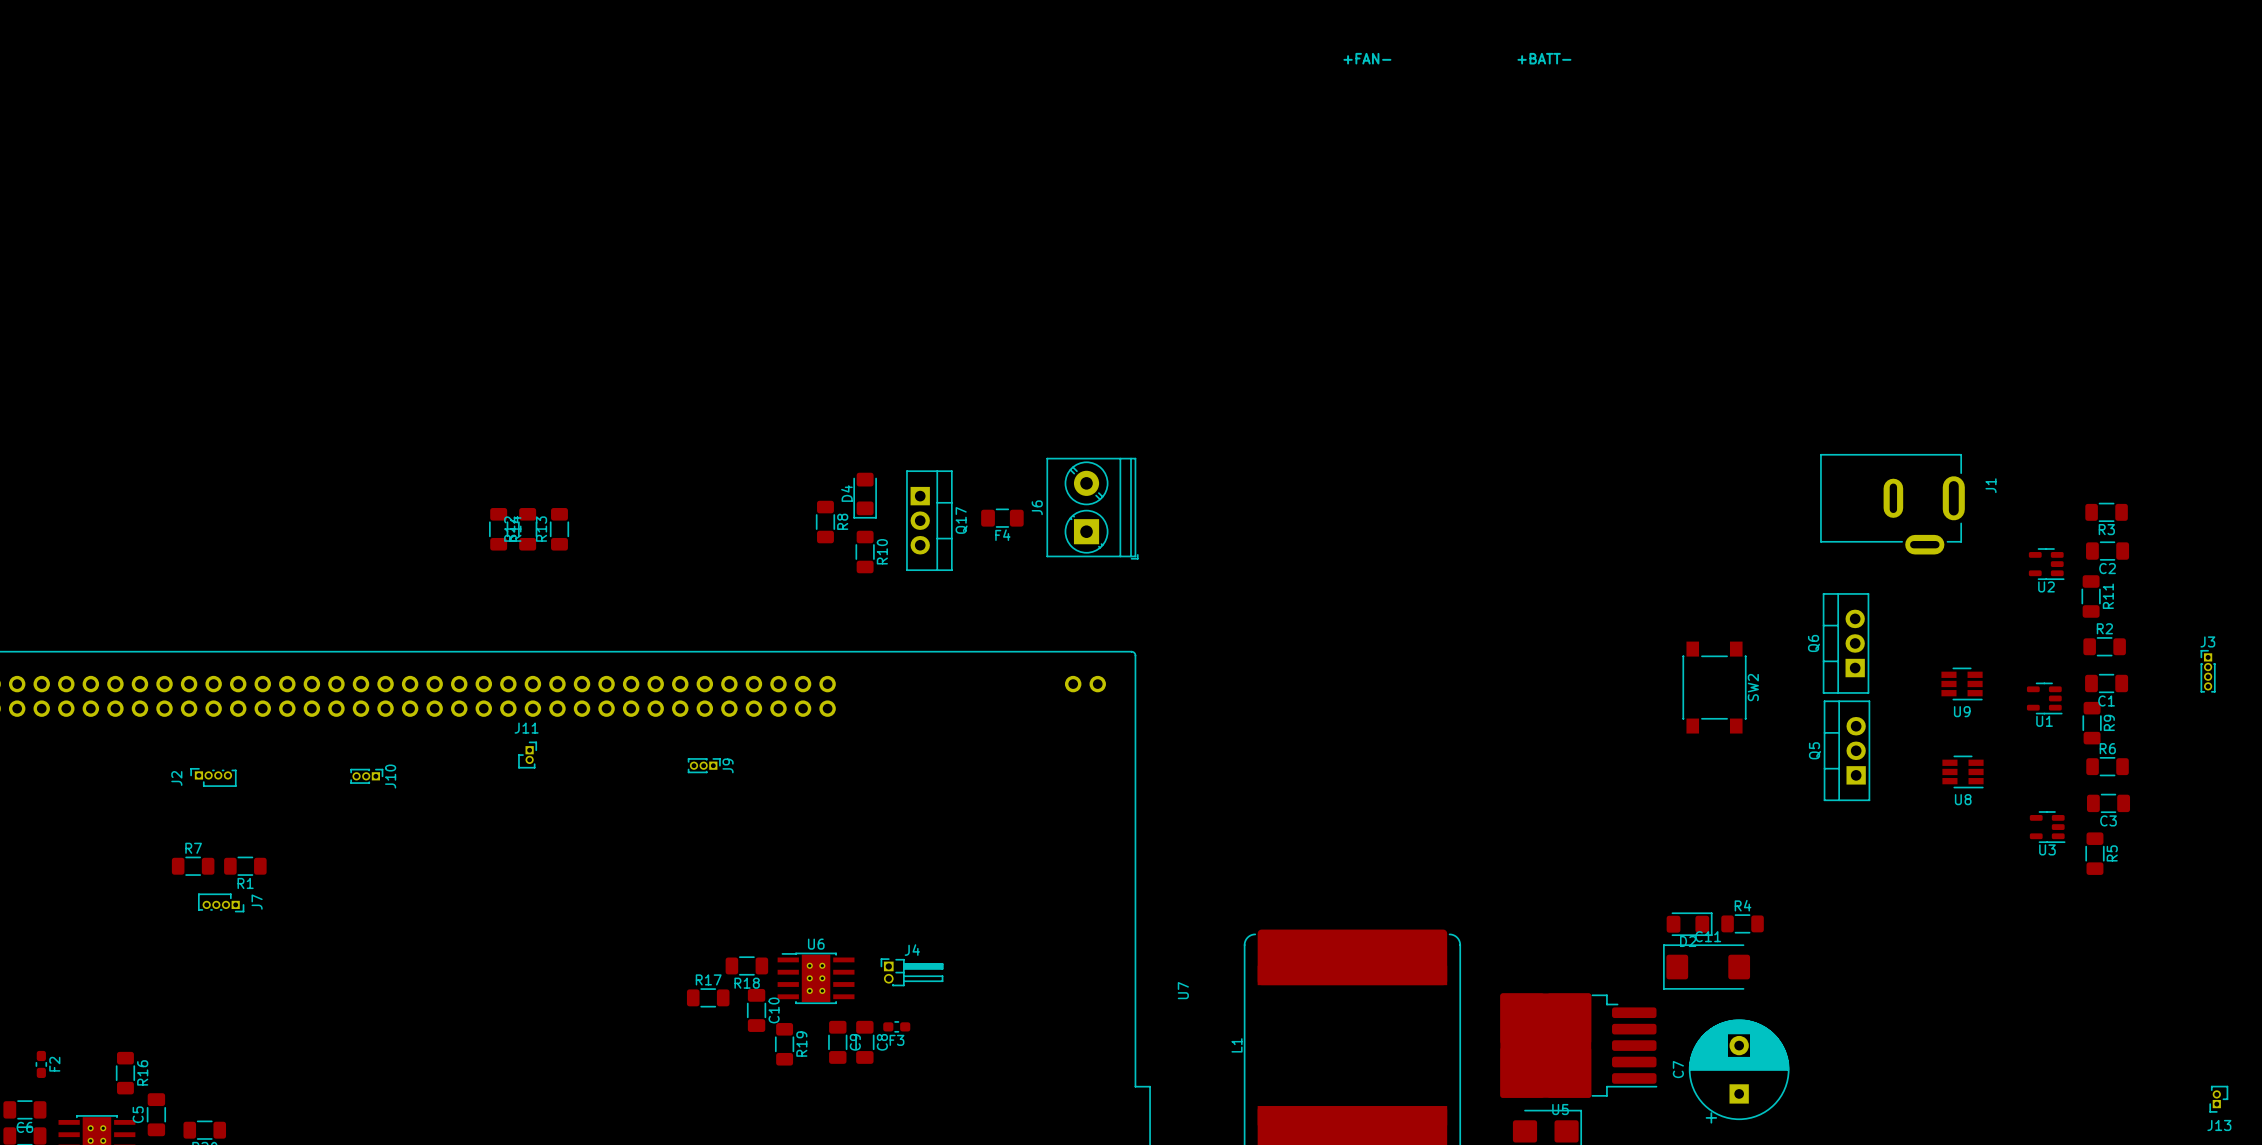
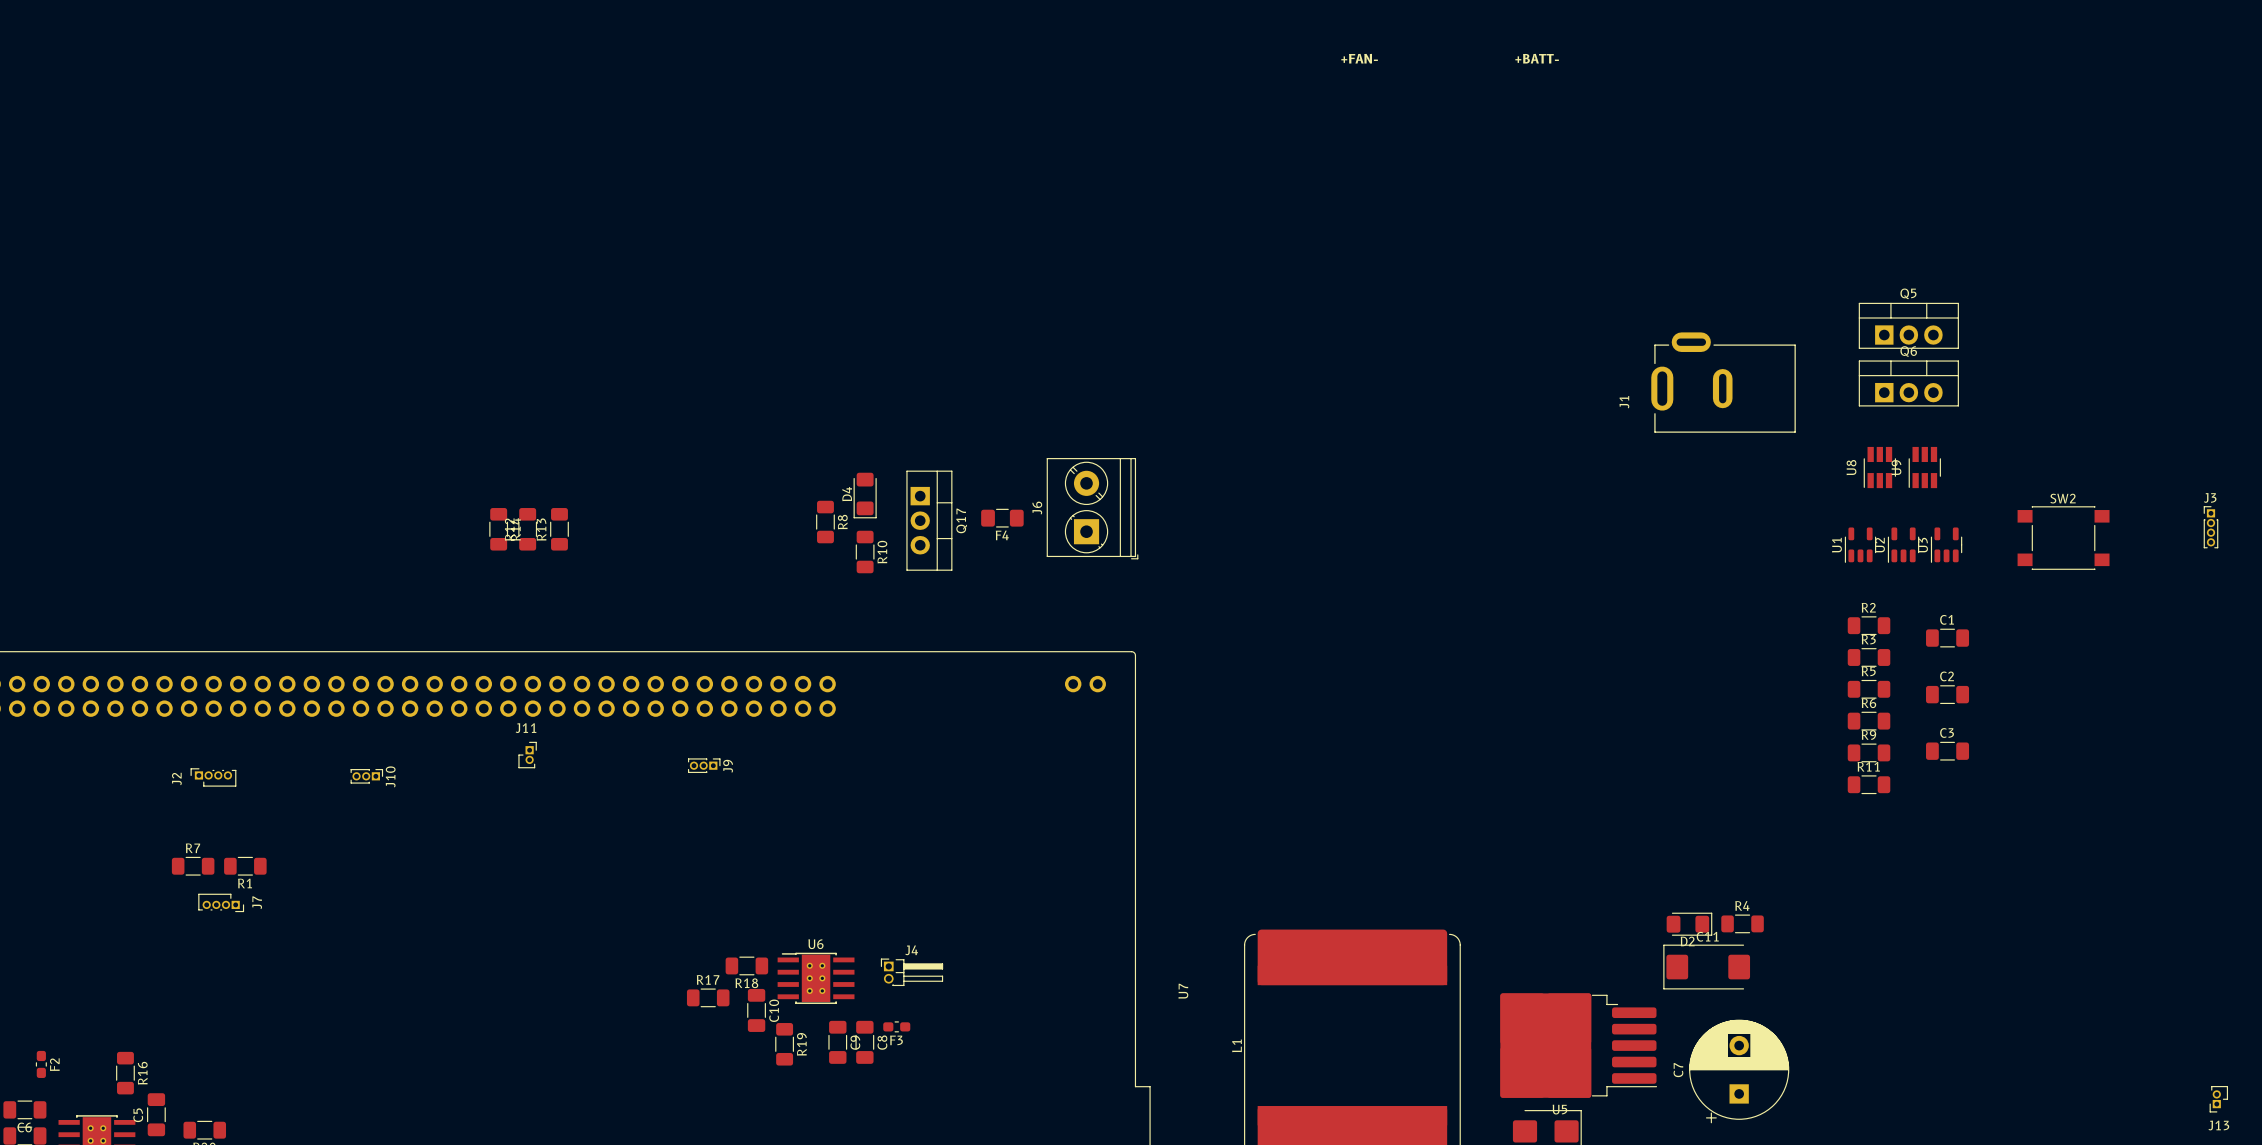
J1 rotation: 0° (1892, 504) -> 180° (1723, 382)
J1 position: (1892, 504) -> (1723, 382)
R3 position: (2106, 512) -> (1869, 657)
R3 name position: R3 (2106, 529) -> R3 (1868, 639)
C2 position: (2107, 551) -> (1947, 694)
U2 rotation: 0° (2046, 564) -> 90° clockwise (1903, 545)
U2 position: (2046, 564) -> (1903, 545)
C2 name position: C2 (2107, 568) -> C2 (1947, 676)
R11 rotation: 0° (2091, 596) -> 90° clockwise (1869, 784)
R11 position: (2091, 596) -> (1869, 784)
R11 name position: R11 (2108, 596) -> R11 (1868, 766)
Q6 rotation: 0° (1846, 643) -> 90° clockwise (1908, 383)
Q6 position: (1846, 643) -> (1908, 383)
R2 position: (2104, 646) -> (1869, 625)
J3 position: (2208, 671) -> (2210, 527)
U9 rotation: 0° (1962, 683) -> 90° clockwise (1924, 467)
U9 position: (1962, 683) -> (1924, 467)
C1 position: (2106, 683) -> (1947, 638)
SW2 rotation: 0° (1714, 687) -> 90° clockwise (2063, 538)
SW2 position: (1714, 687) -> (2063, 538)
SW2 name position: SW2 (1753, 687) -> SW2 (2063, 498)
U1 rotation: 0° (2044, 698) -> 90° clockwise (1860, 545)
U1 position: (2044, 698) -> (1860, 545)
Q5 footprint: [1823, 700, 1870, 801] -> [1858, 302, 1959, 349]
C1 name position: C1 (2106, 701) -> C1 (1947, 619)
R9 name position: R9 (2109, 722) -> R9 (1868, 735)
R9 rotation: 0° (2092, 723) -> 90° clockwise (1869, 752)
R9 position: (2092, 723) -> (1869, 752)
Q5 name position: Q5 (1814, 750) -> Q5 (1908, 293)
R6 position: (2107, 766) -> (1869, 721)
U8 rotation: 0° (1962, 771) -> 90° clockwise (1879, 467)
U8 position: (1962, 771) -> (1879, 467)
C3 position: (2108, 803) -> (1947, 751)
C3 name position: C3 (2108, 820) -> C3 (1947, 732)
U3 rotation: 0° (2047, 827) -> 90° clockwise (1946, 545)
U3 position: (2047, 827) -> (1946, 545)
R5 rotation: 0° (2094, 853) -> 90° clockwise (1869, 689)
R5 position: (2094, 853) -> (1869, 689)
R5 name position: R5 (2112, 853) -> R5 (1868, 671)

